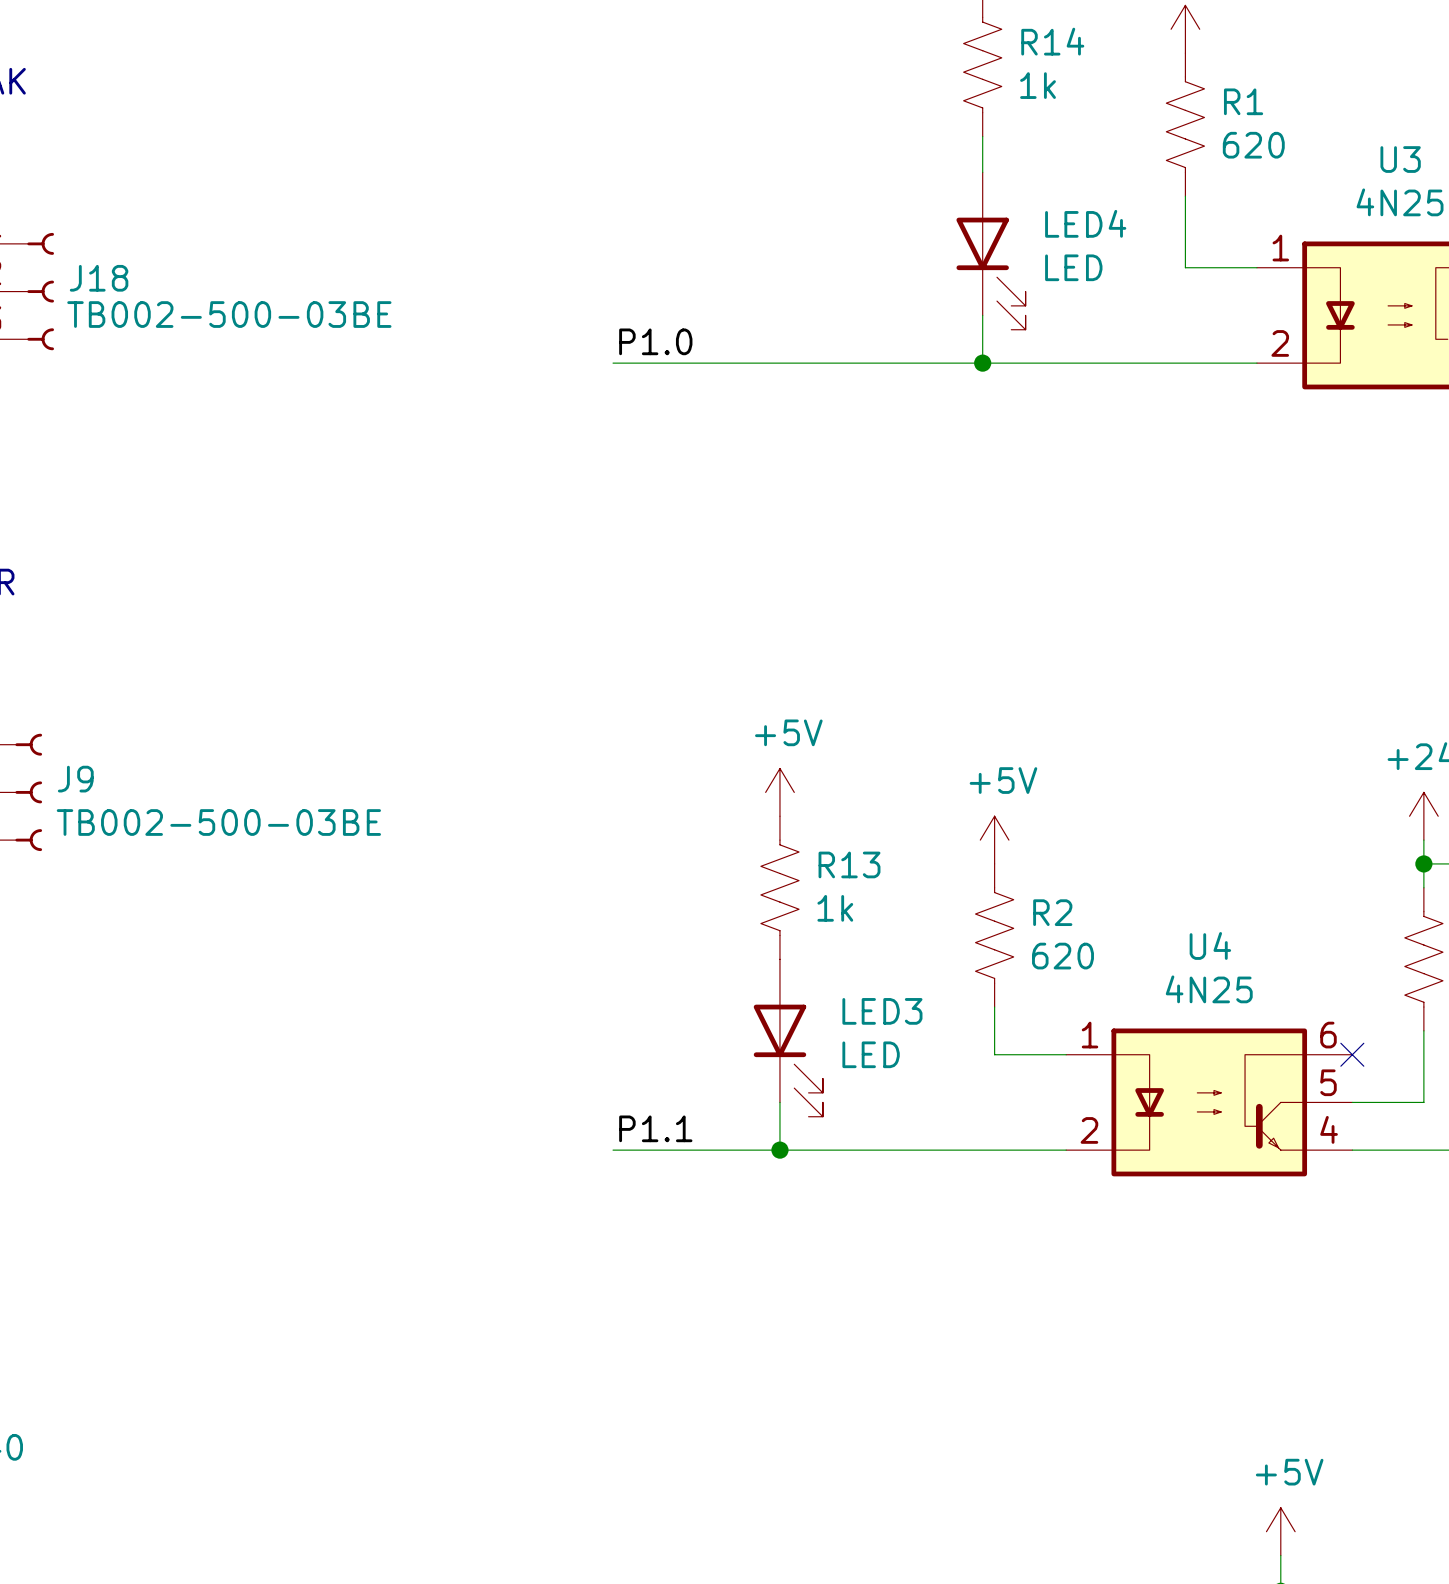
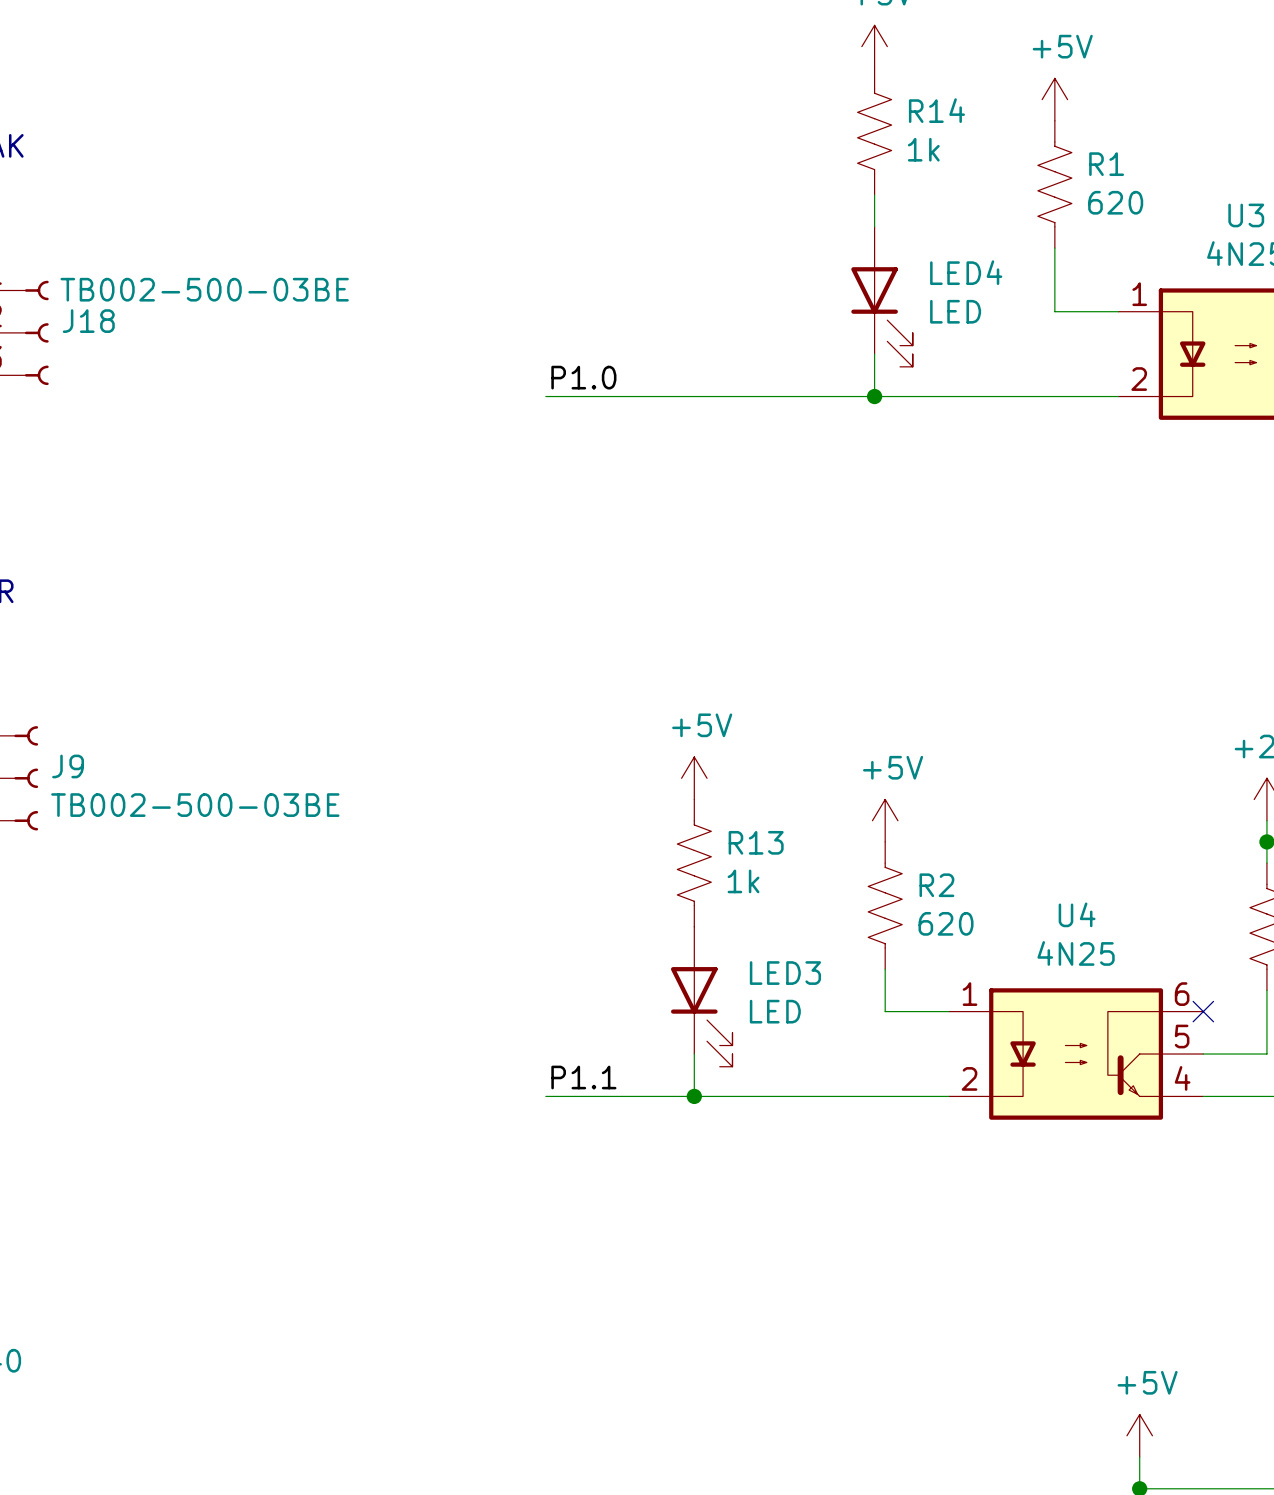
J18 value position: TB002-500-03BE (229, 314) -> TB002-500-03BE (204, 289)

